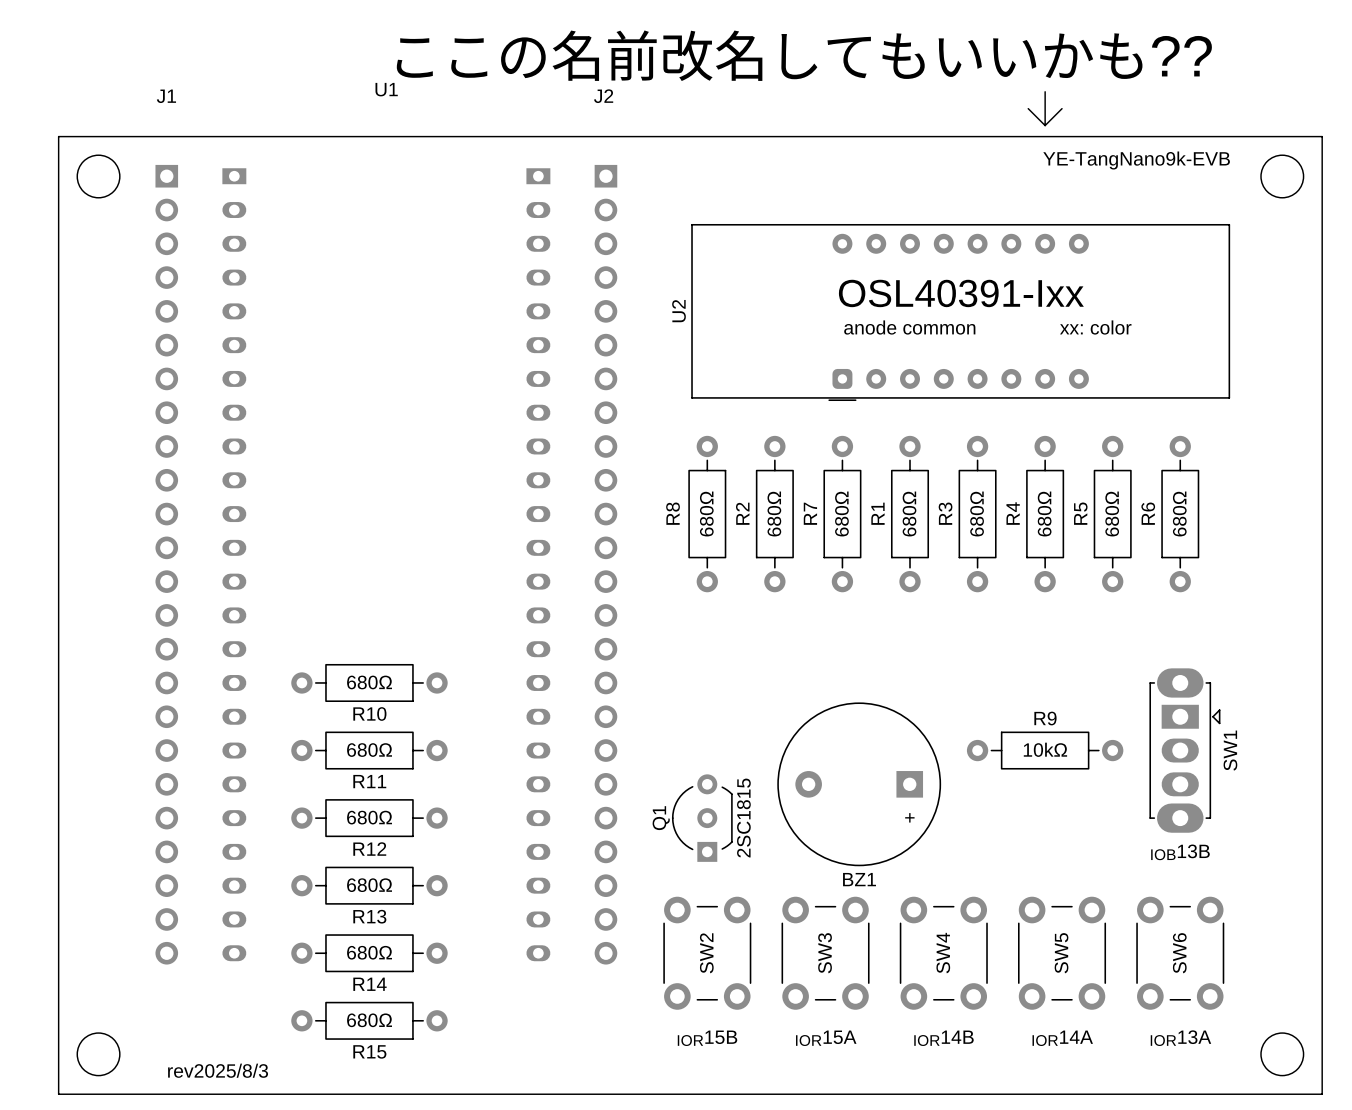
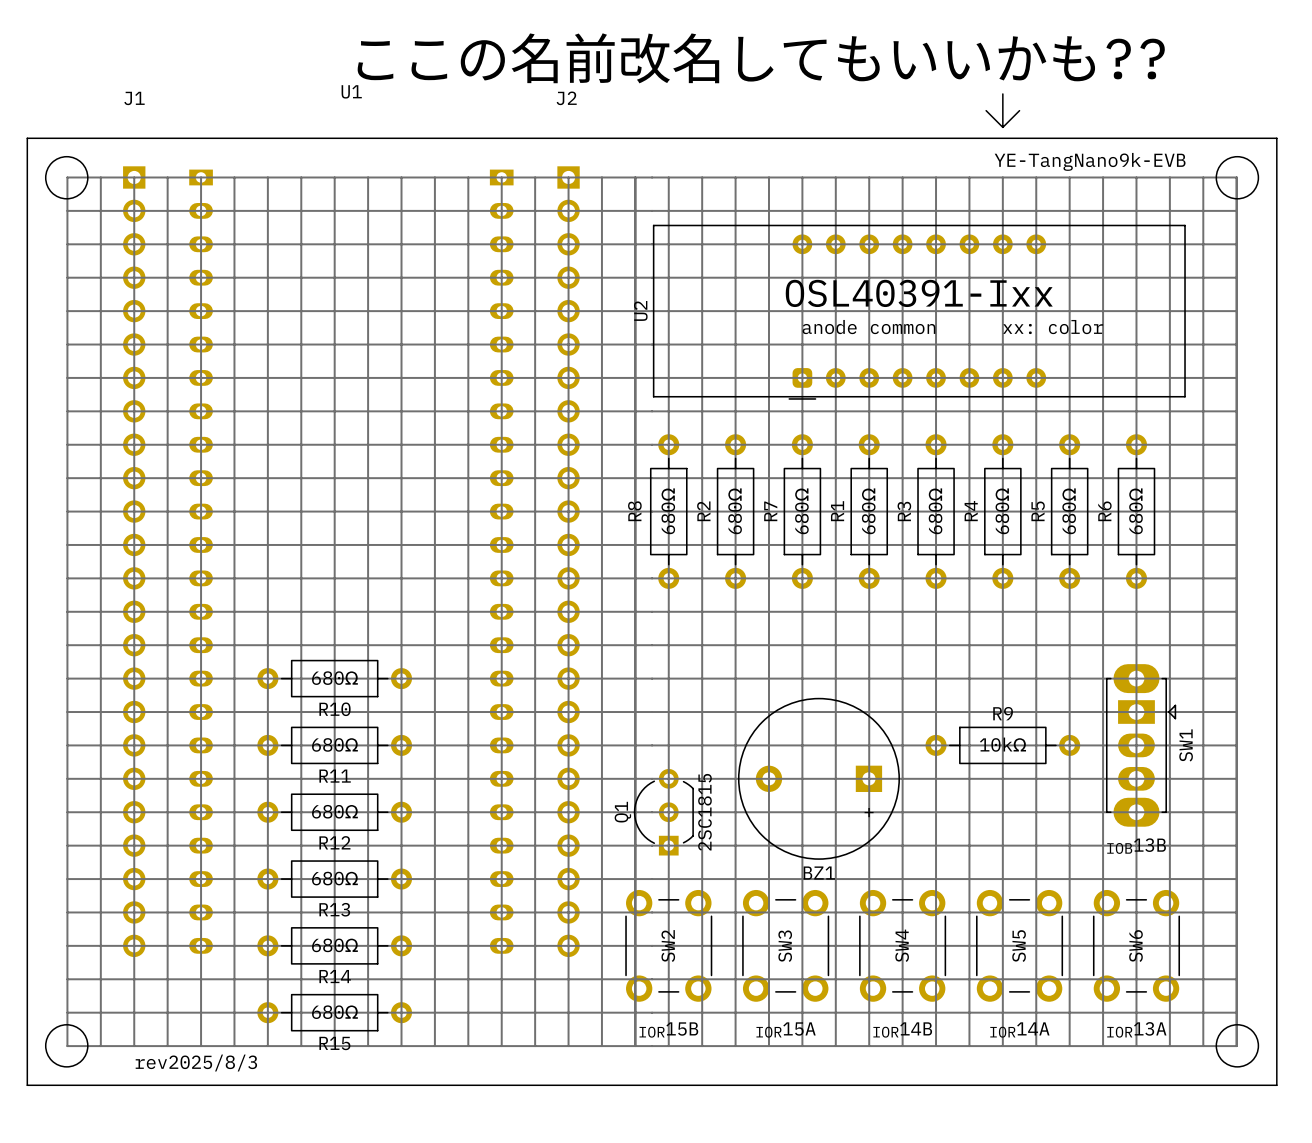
line: none -> (67, 177) (67, 1046) (1236, 1046) (1236, 177) (67, 177)
line: none -> (100, 177) (100, 1046)
line: none -> (134, 177) (134, 1046)
line: none -> (167, 177) (167, 1046)
line: none -> (201, 177) (201, 1046)
line: none -> (234, 177) (234, 1046)
line: none -> (267, 177) (267, 1046)
line: none -> (301, 177) (301, 1046)
line: none -> (334, 177) (334, 1046)
line: none -> (368, 177) (368, 1046)
line: none -> (401, 177) (401, 1046)
line: none -> (434, 177) (434, 1046)
line: none -> (468, 177) (468, 1046)
line: none -> (501, 177) (501, 1046)
line: none -> (535, 177) (535, 1046)
line: none -> (568, 177) (568, 1046)
line: none -> (601, 177) (601, 1046)
line: none -> (635, 177) (635, 1046)
line: none -> (668, 177) (668, 1046)
line: none -> (702, 177) (702, 1046)
line: none -> (735, 177) (735, 1046)
line: none -> (768, 177) (768, 1046)
line: none -> (802, 177) (802, 1046)
line: none -> (835, 177) (835, 1046)
line: none -> (869, 177) (869, 1046)
line: none -> (902, 177) (902, 1046)
line: none -> (936, 177) (936, 1046)
line: none -> (969, 177) (969, 1046)
line: none -> (1002, 177) (1002, 1046)
line: none -> (1036, 177) (1036, 1046)
line: none -> (1069, 177) (1069, 1046)
line: none -> (1103, 177) (1103, 1046)
line: none -> (1136, 177) (1136, 1046)
line: none -> (1169, 177) (1169, 1046)
line: none -> (1203, 177) (1203, 1046)
line: none -> (67, 210) (1236, 210)
line: none -> (67, 244) (1236, 244)
line: none -> (67, 277) (1236, 277)
line: none -> (67, 311) (1236, 311)
line: none -> (67, 344) (1236, 344)
line: none -> (67, 377) (1236, 377)
line: none -> (67, 411) (1236, 411)
line: none -> (67, 444) (1236, 444)
line: none -> (67, 478) (1236, 478)
line: none -> (67, 511) (1236, 511)
line: none -> (67, 544) (1236, 544)
line: none -> (67, 578) (1236, 578)
line: none -> (67, 611) (1236, 611)
line: none -> (67, 645) (1236, 645)
line: none -> (67, 678) (1236, 678)
line: none -> (67, 712) (1236, 712)
line: none -> (67, 745) (1236, 745)
line: none -> (67, 778) (1236, 778)
line: none -> (67, 812) (1236, 812)
line: none -> (67, 845) (1236, 845)
line: none -> (67, 879) (1236, 879)
line: none -> (67, 912) (1236, 912)
line: none -> (67, 945) (1236, 945)
line: none -> (67, 979) (1236, 979)
line: none -> (67, 1012) (1236, 1012)

